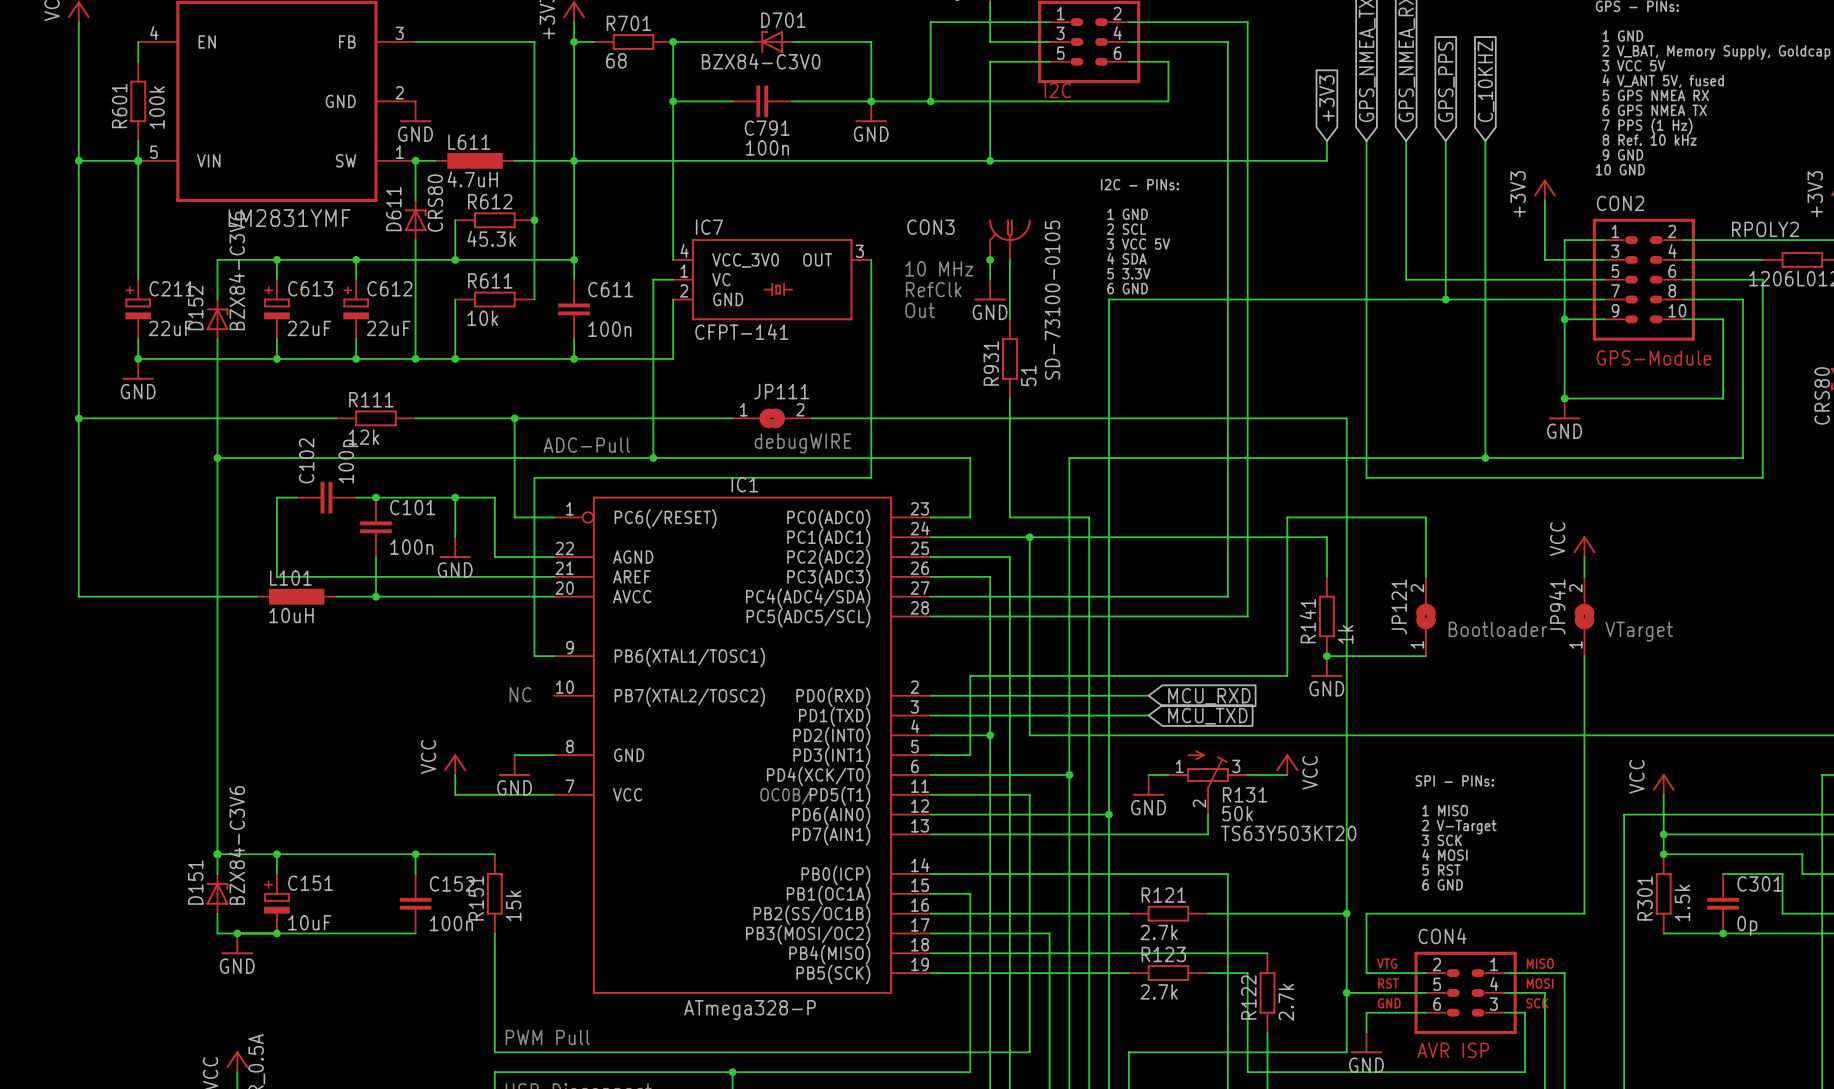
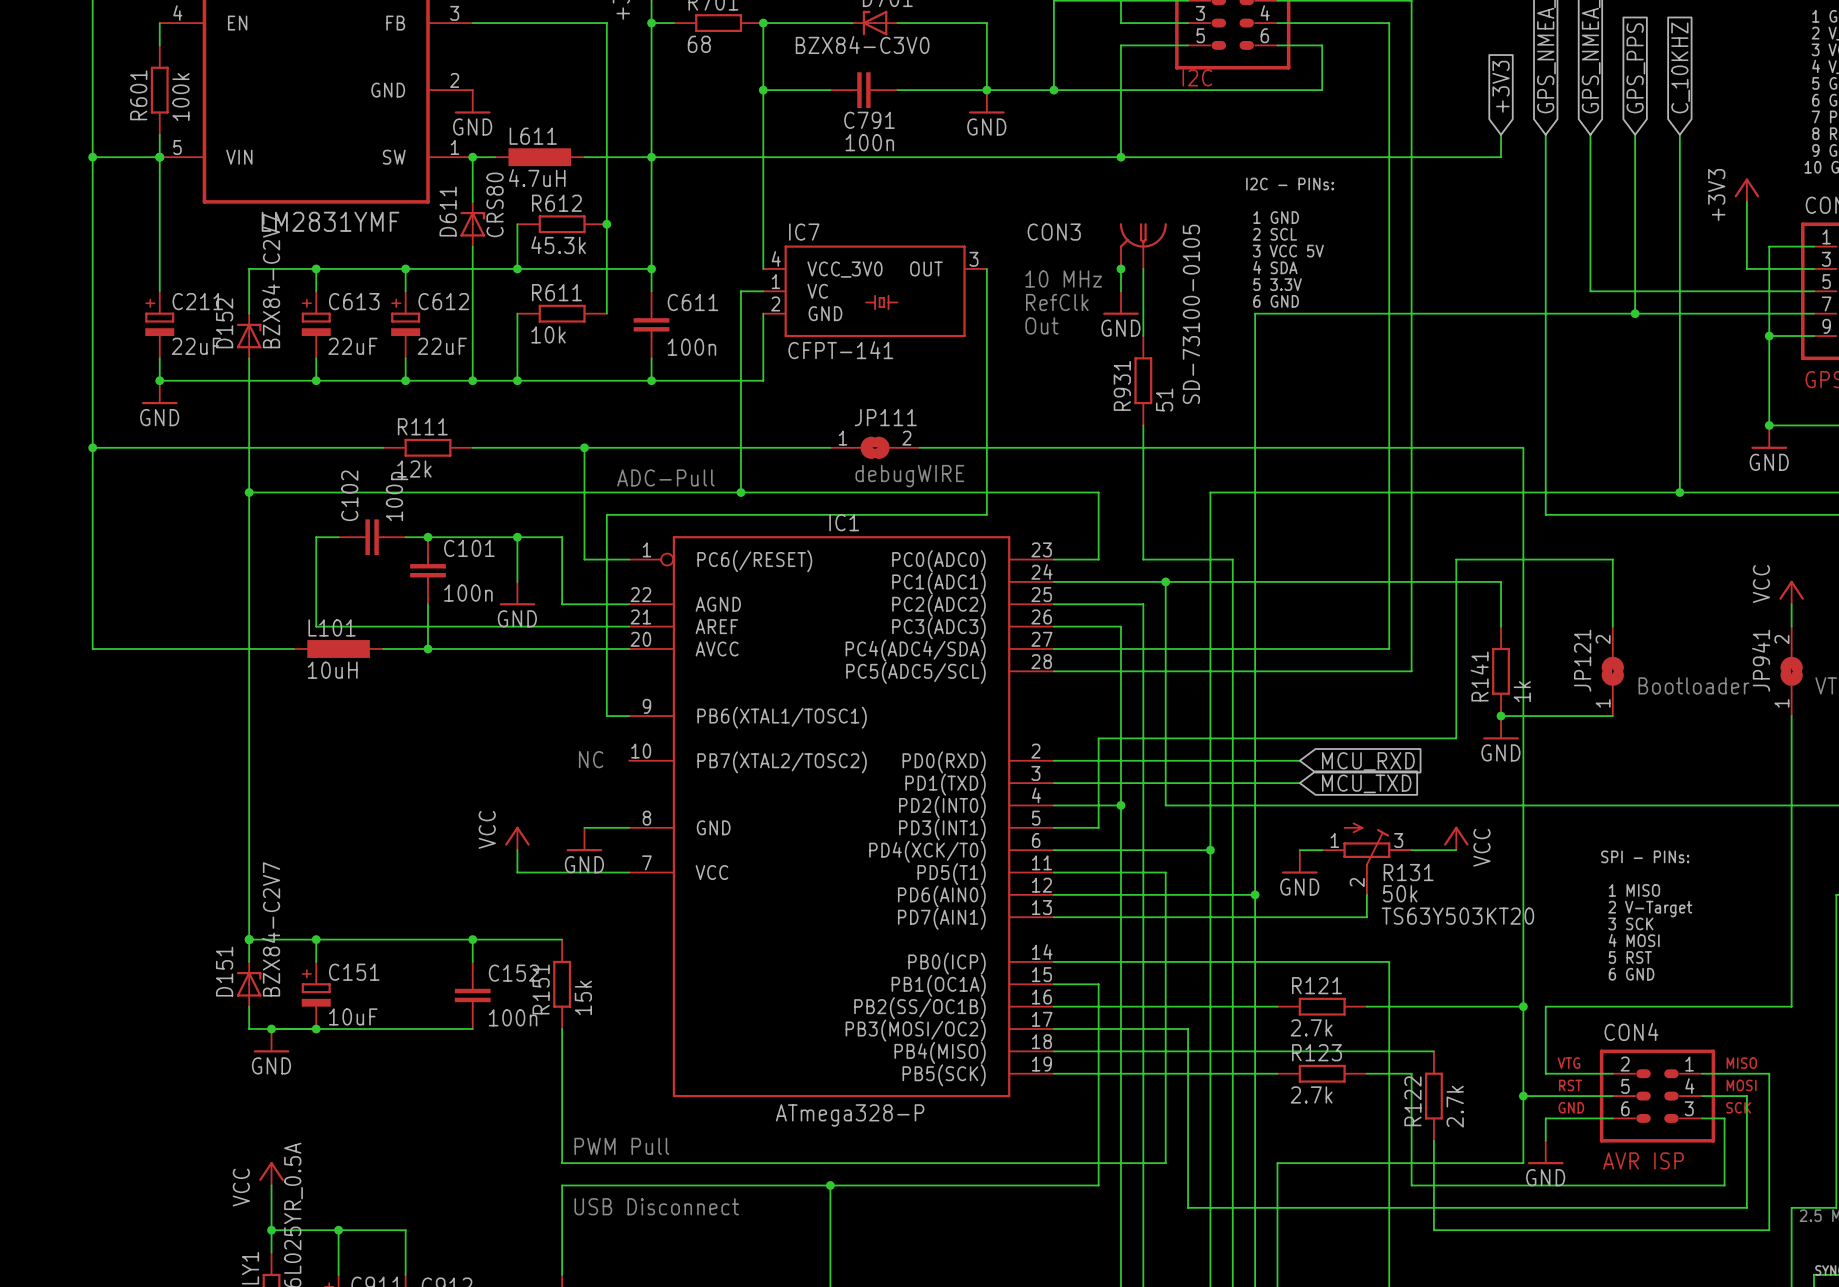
D152 value: BZX84-C3V6 (236, 270) -> BZX84-C2V7 (271, 281)
text: OC0B/ (786, 795) -> none
D151 value: BZX84-C3V6 (236, 845) -> BZX84-C2V7 (271, 929)

